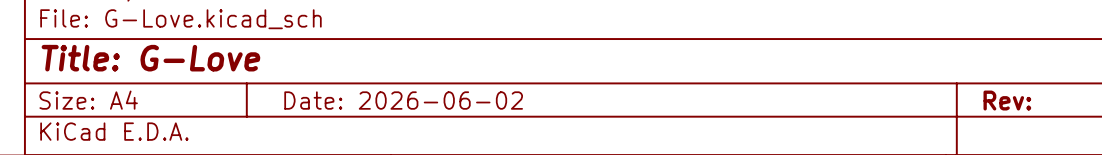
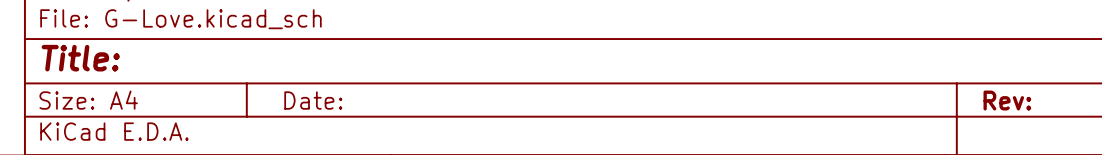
title block: Title: G-Love (150, 58) -> Title: (80, 58)
title block: Date: 2026-06-02 (403, 100) -> Date: (313, 100)

